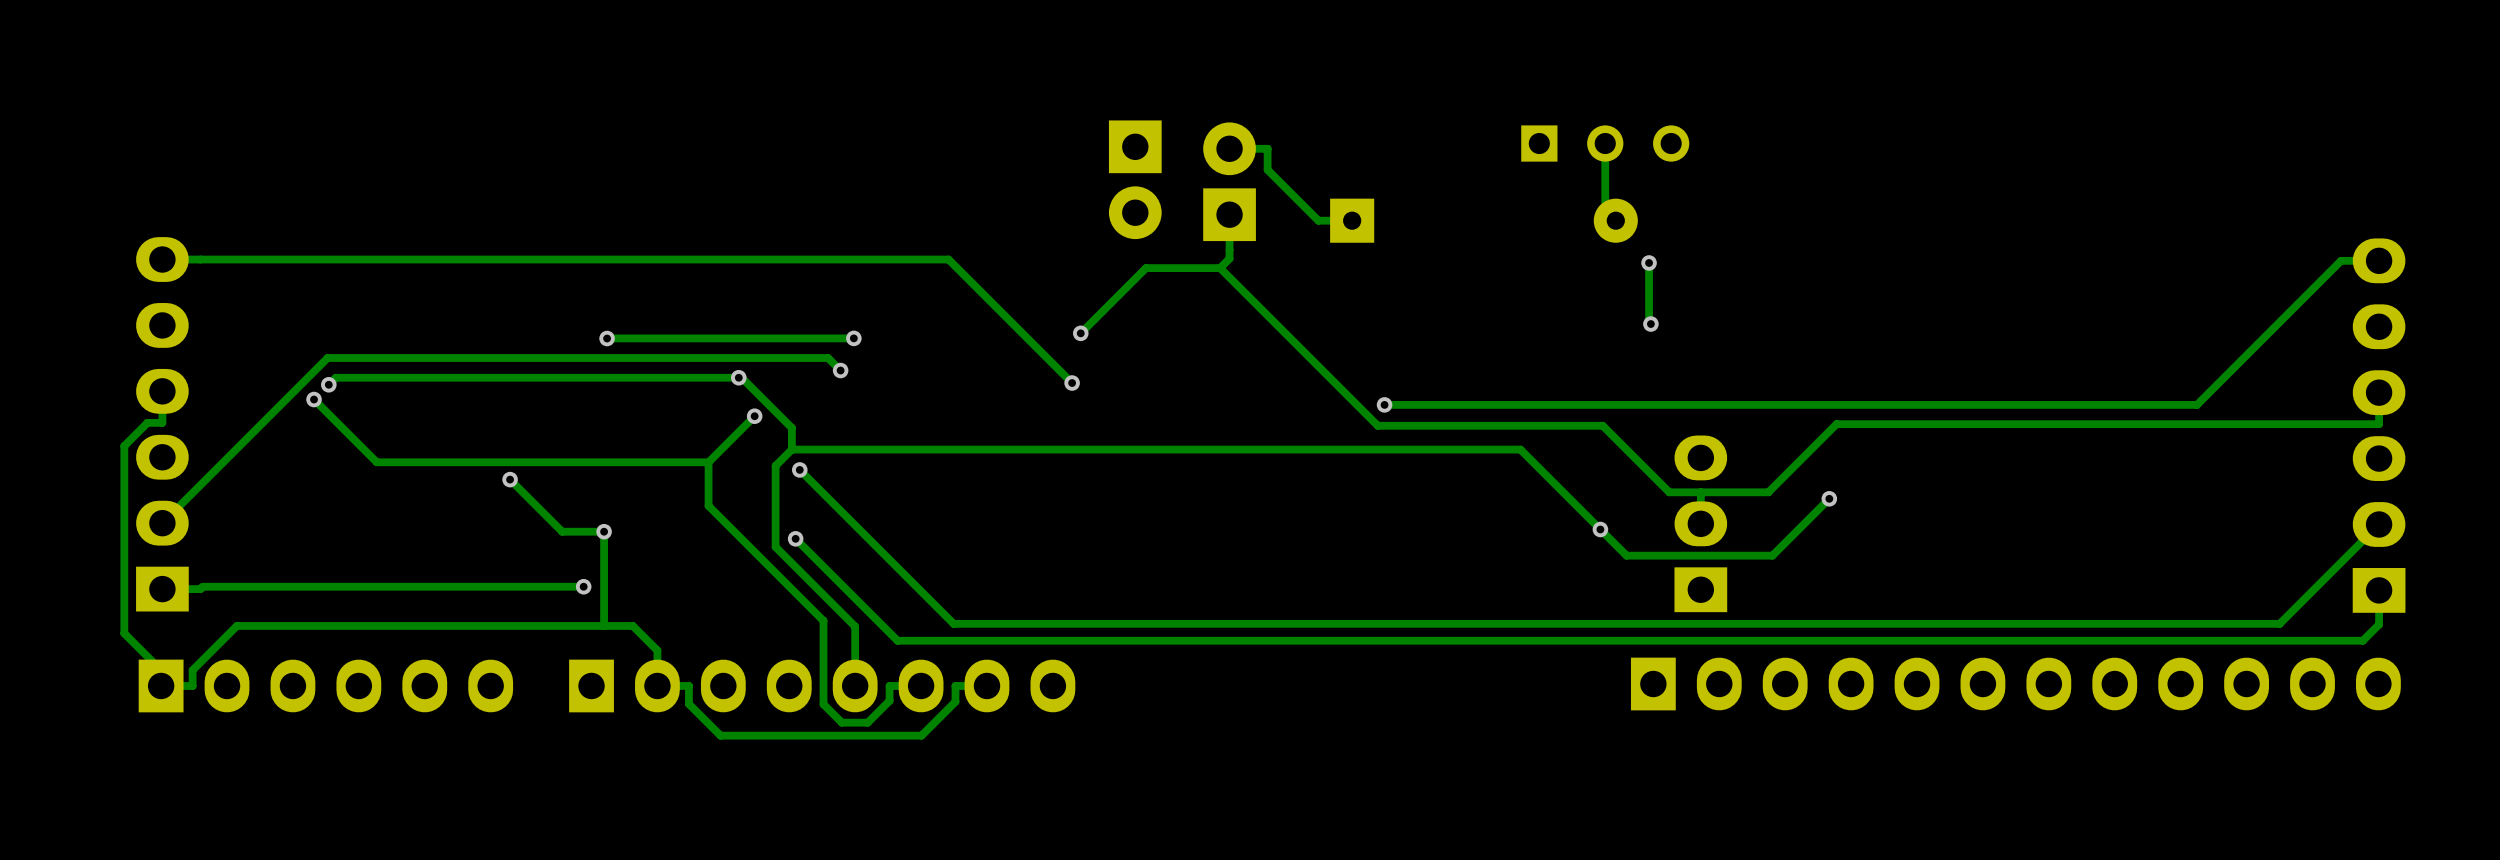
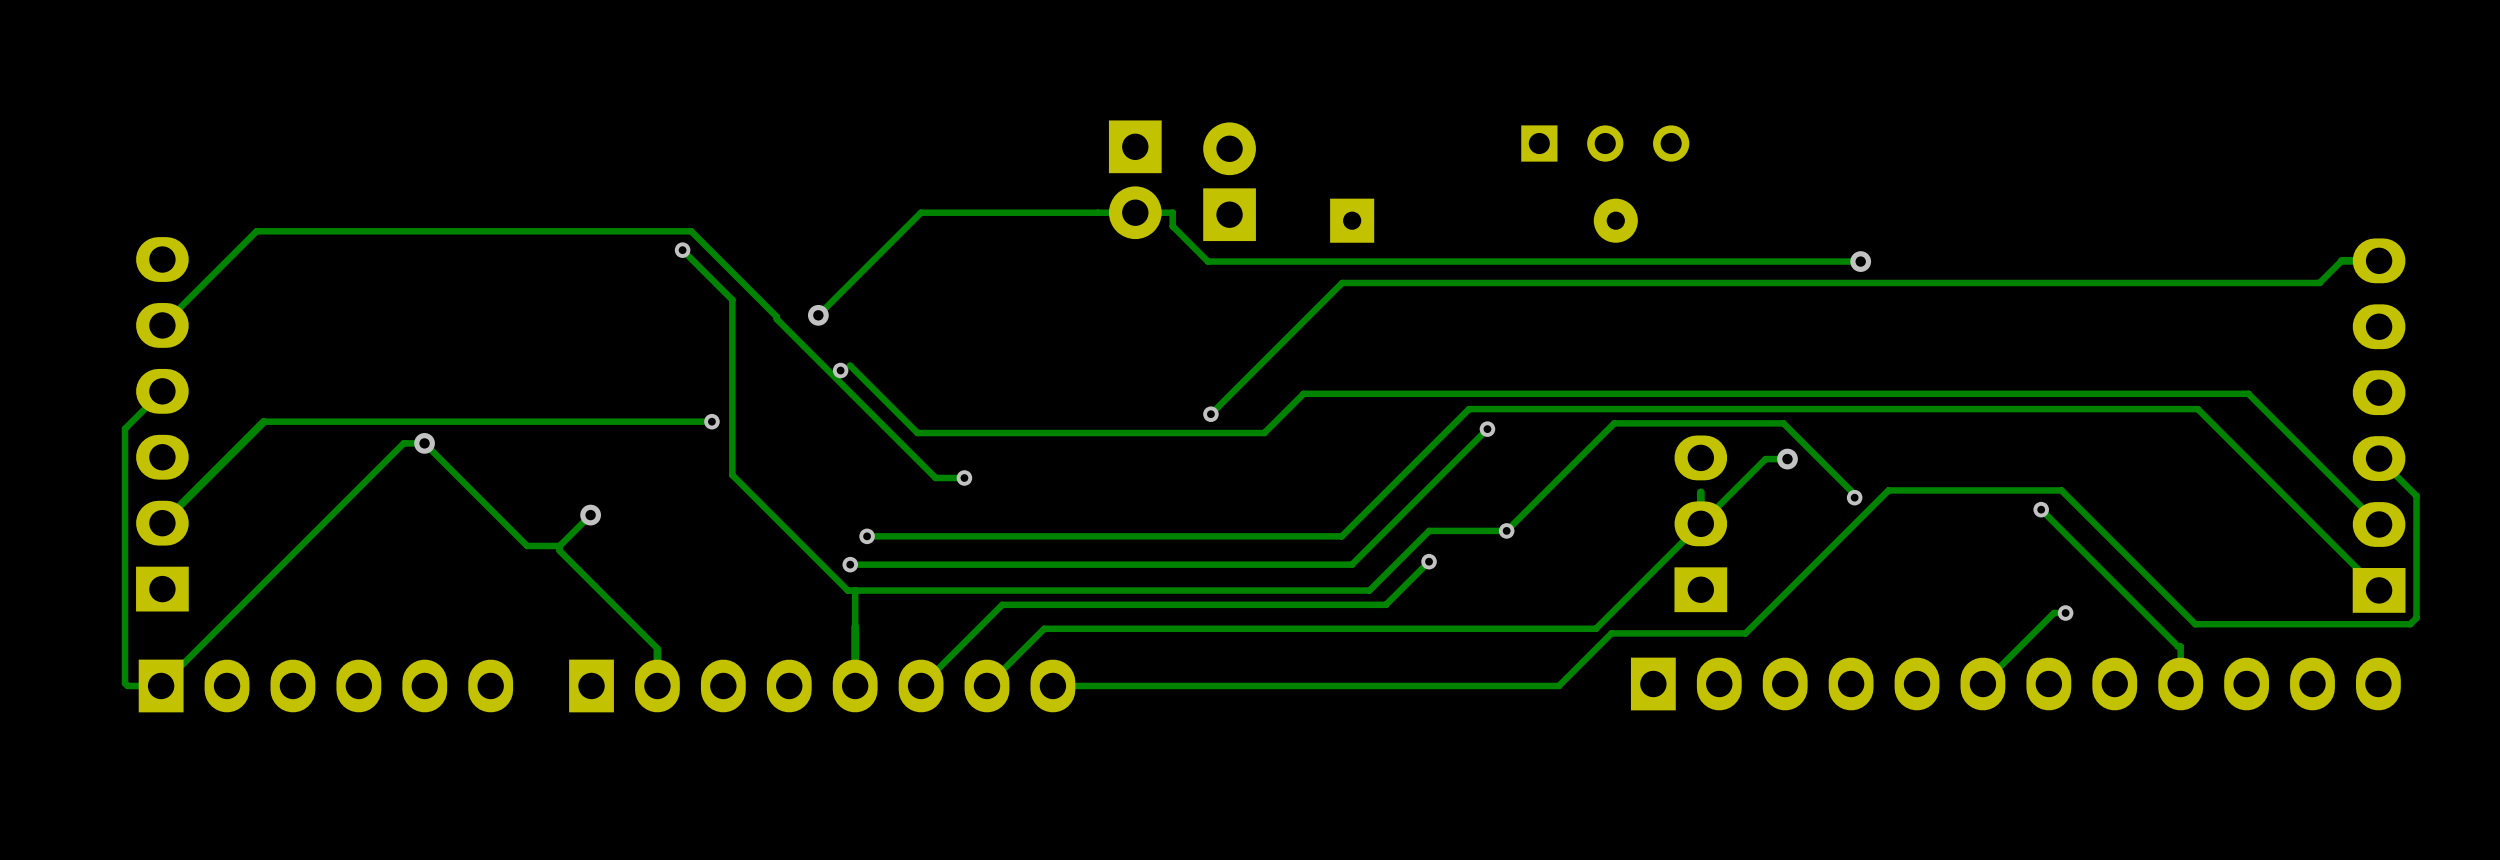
track: (1605, 143) (1605, 210) (1615, 220) -> none
track: (1229, 148) (1267, 148) (1267, 169) (1318, 220) (1352, 220) -> none
track: (1229, 214) (1229, 258) (1220, 268) -> none
track: none -> (682, 250) (732, 299) (732, 475) (847, 590) (1369, 590) (1429, 530) (1506, 530) (1614, 423) (1783, 423) (1854, 494) (1854, 497)
via: none -> (682, 250)
track: (162, 259) (948, 259) (1072, 383) -> none
track: (2341, 260) (2196, 404) (1384, 404) -> (2341, 260) (2319, 282) (1342, 282) (1210, 414)
track: none -> (1860, 261) (1207, 261) (1172, 226) (1172, 212) (920, 212) (818, 315)
via: none -> (1860, 261)
track: (1649, 262) (1649, 322) (1650, 324) -> none
via: (1649, 262) -> none
track: (1220, 268) (1377, 425) (1602, 425) (1669, 492) (1768, 492) (1836, 424) (2379, 424) (2379, 392) -> none
track: (1220, 268) (1145, 268) (1080, 333) -> none
via: none -> (818, 315)
via: (1650, 324) -> none
track: none -> (162, 325) (256, 231) (691, 231) (935, 477) (964, 477)
via: (1080, 333) -> none
via: (607, 338) -> none
track: (853, 338) (607, 338) -> none
via: (853, 338) -> none
track: (840, 370) (828, 358) (327, 358) (263, 421) -> (711, 421) (263, 421)
via: (738, 377) -> none
via: (1072, 383) -> none
track: (328, 384) (335, 377) (741, 377) (791, 427) (791, 449) -> none
via: (328, 384) -> none
track: (162, 391) (162, 422) (147, 422) (124, 446) (124, 633) (176, 685) -> (162, 391) (125, 428) (125, 683) (127, 685) (161, 685) (403, 443) (424, 443) (527, 545) (559, 545)
track: (314, 399) (376, 462) (708, 462) -> none
via: (314, 399) -> none
via: (1384, 404) -> none
via: none -> (1210, 414)
track: (754, 416) (708, 462) -> none
via: (754, 416) -> none
via: none -> (711, 421)
track: none -> (1487, 429) (1351, 564) (850, 564)
via: none -> (1487, 429)
via: none -> (424, 443)
track: (791, 449) (775, 465) (775, 547) (855, 626) -> (855, 590) (855, 626)
track: (791, 449) (1520, 449) (1626, 555) (1772, 555) (1829, 498) -> none
track: none -> (2379, 458) (2416, 496) (2416, 617) (2410, 624) (2195, 624) (2061, 490) (1888, 490) (1745, 633) (1611, 633) (1558, 685) (1052, 685)
via: none -> (1787, 459)
track: (708, 462) (708, 505) (823, 620) (823, 704) (841, 722) (867, 722) (889, 700) (889, 685) (921, 685) -> (1429, 561) (1385, 604) (1002, 604) (921, 685)
track: (799, 469) (953, 623) (2279, 623) (2379, 524) -> (849, 365) (917, 433) (1264, 433) (1303, 393) (2248, 393) (2379, 524)
via: (799, 469) -> none
via: none -> (964, 477)
track: (510, 479) (562, 531) (604, 531) (604, 625) -> none
via: (510, 479) -> none
via position: (1829, 498) -> (1854, 497)
track: none -> (2041, 509) (2178, 646) (2180, 646) (2180, 684)
via: none -> (2041, 509)
track: none -> (590, 515) (559, 545)
via: (1600, 529) -> none
via: none -> (1506, 530)
via position: (604, 531) -> (590, 515)
via: none -> (867, 536)
track: (795, 538) (897, 640) (2362, 640) (2379, 624) (2379, 590) -> (867, 536) (1341, 536) (1469, 409) (2197, 409) (2379, 590)
via: (795, 538) -> none
via: none -> (1429, 561)
via: none -> (850, 564)
track: (583, 586) (202, 586) (200, 589) (162, 589) -> none
via: (583, 586) -> none
track: none -> (2065, 613) (2053, 613) (1982, 684)
via: none -> (2065, 613)
track: (657, 650) (632, 625) (236, 625) (192, 670) (192, 685) (161, 685) -> (657, 650) (559, 550) (559, 545)
track: (987, 685) (955, 685) (955, 701) (921, 735) (720, 735) (688, 704) (688, 685) (657, 685) -> (987, 685) (1044, 628) (1595, 628) (1765, 459) (1787, 459)

